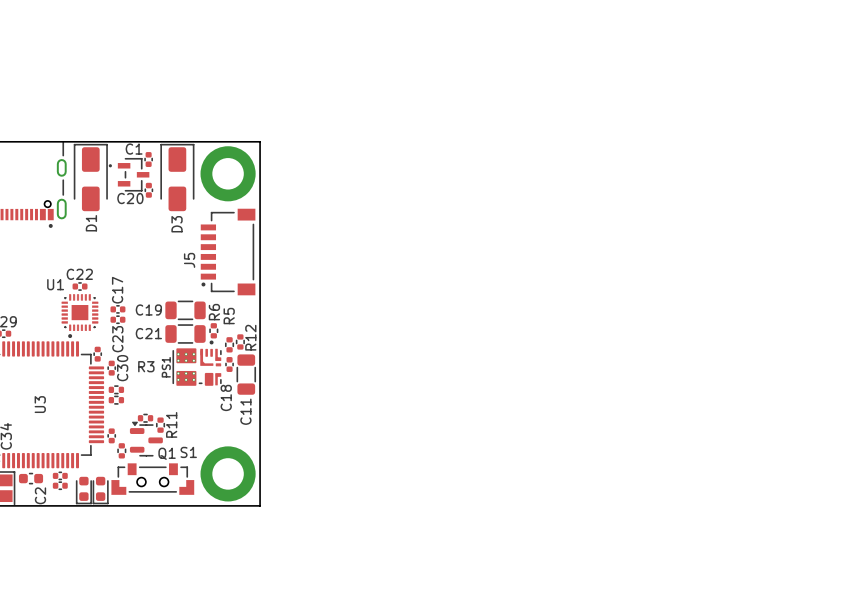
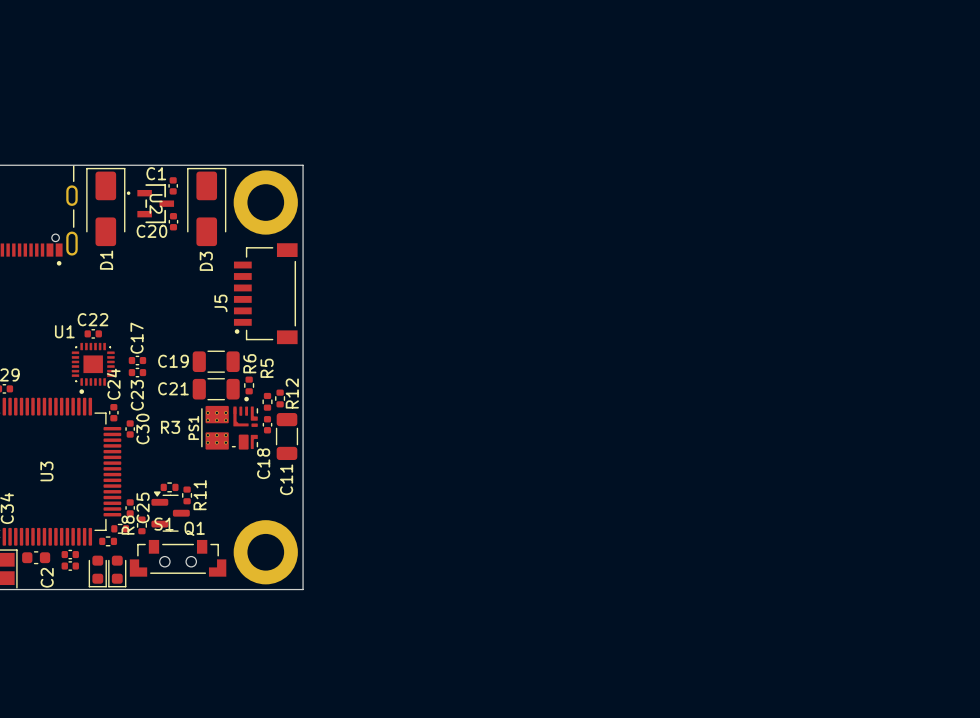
U2 name: none -> U2 (156, 203)
C24 name: none -> C24 (113, 384)
part: (116, 389) -> none
part: (116, 400) -> none
C25 name: none -> C25 (143, 507)
R8 name: none -> R8 (128, 525)
S1 name position: S1 (188, 452) -> S1 (164, 524)
part: none -> (120, 528)
part: none -> (108, 541)

